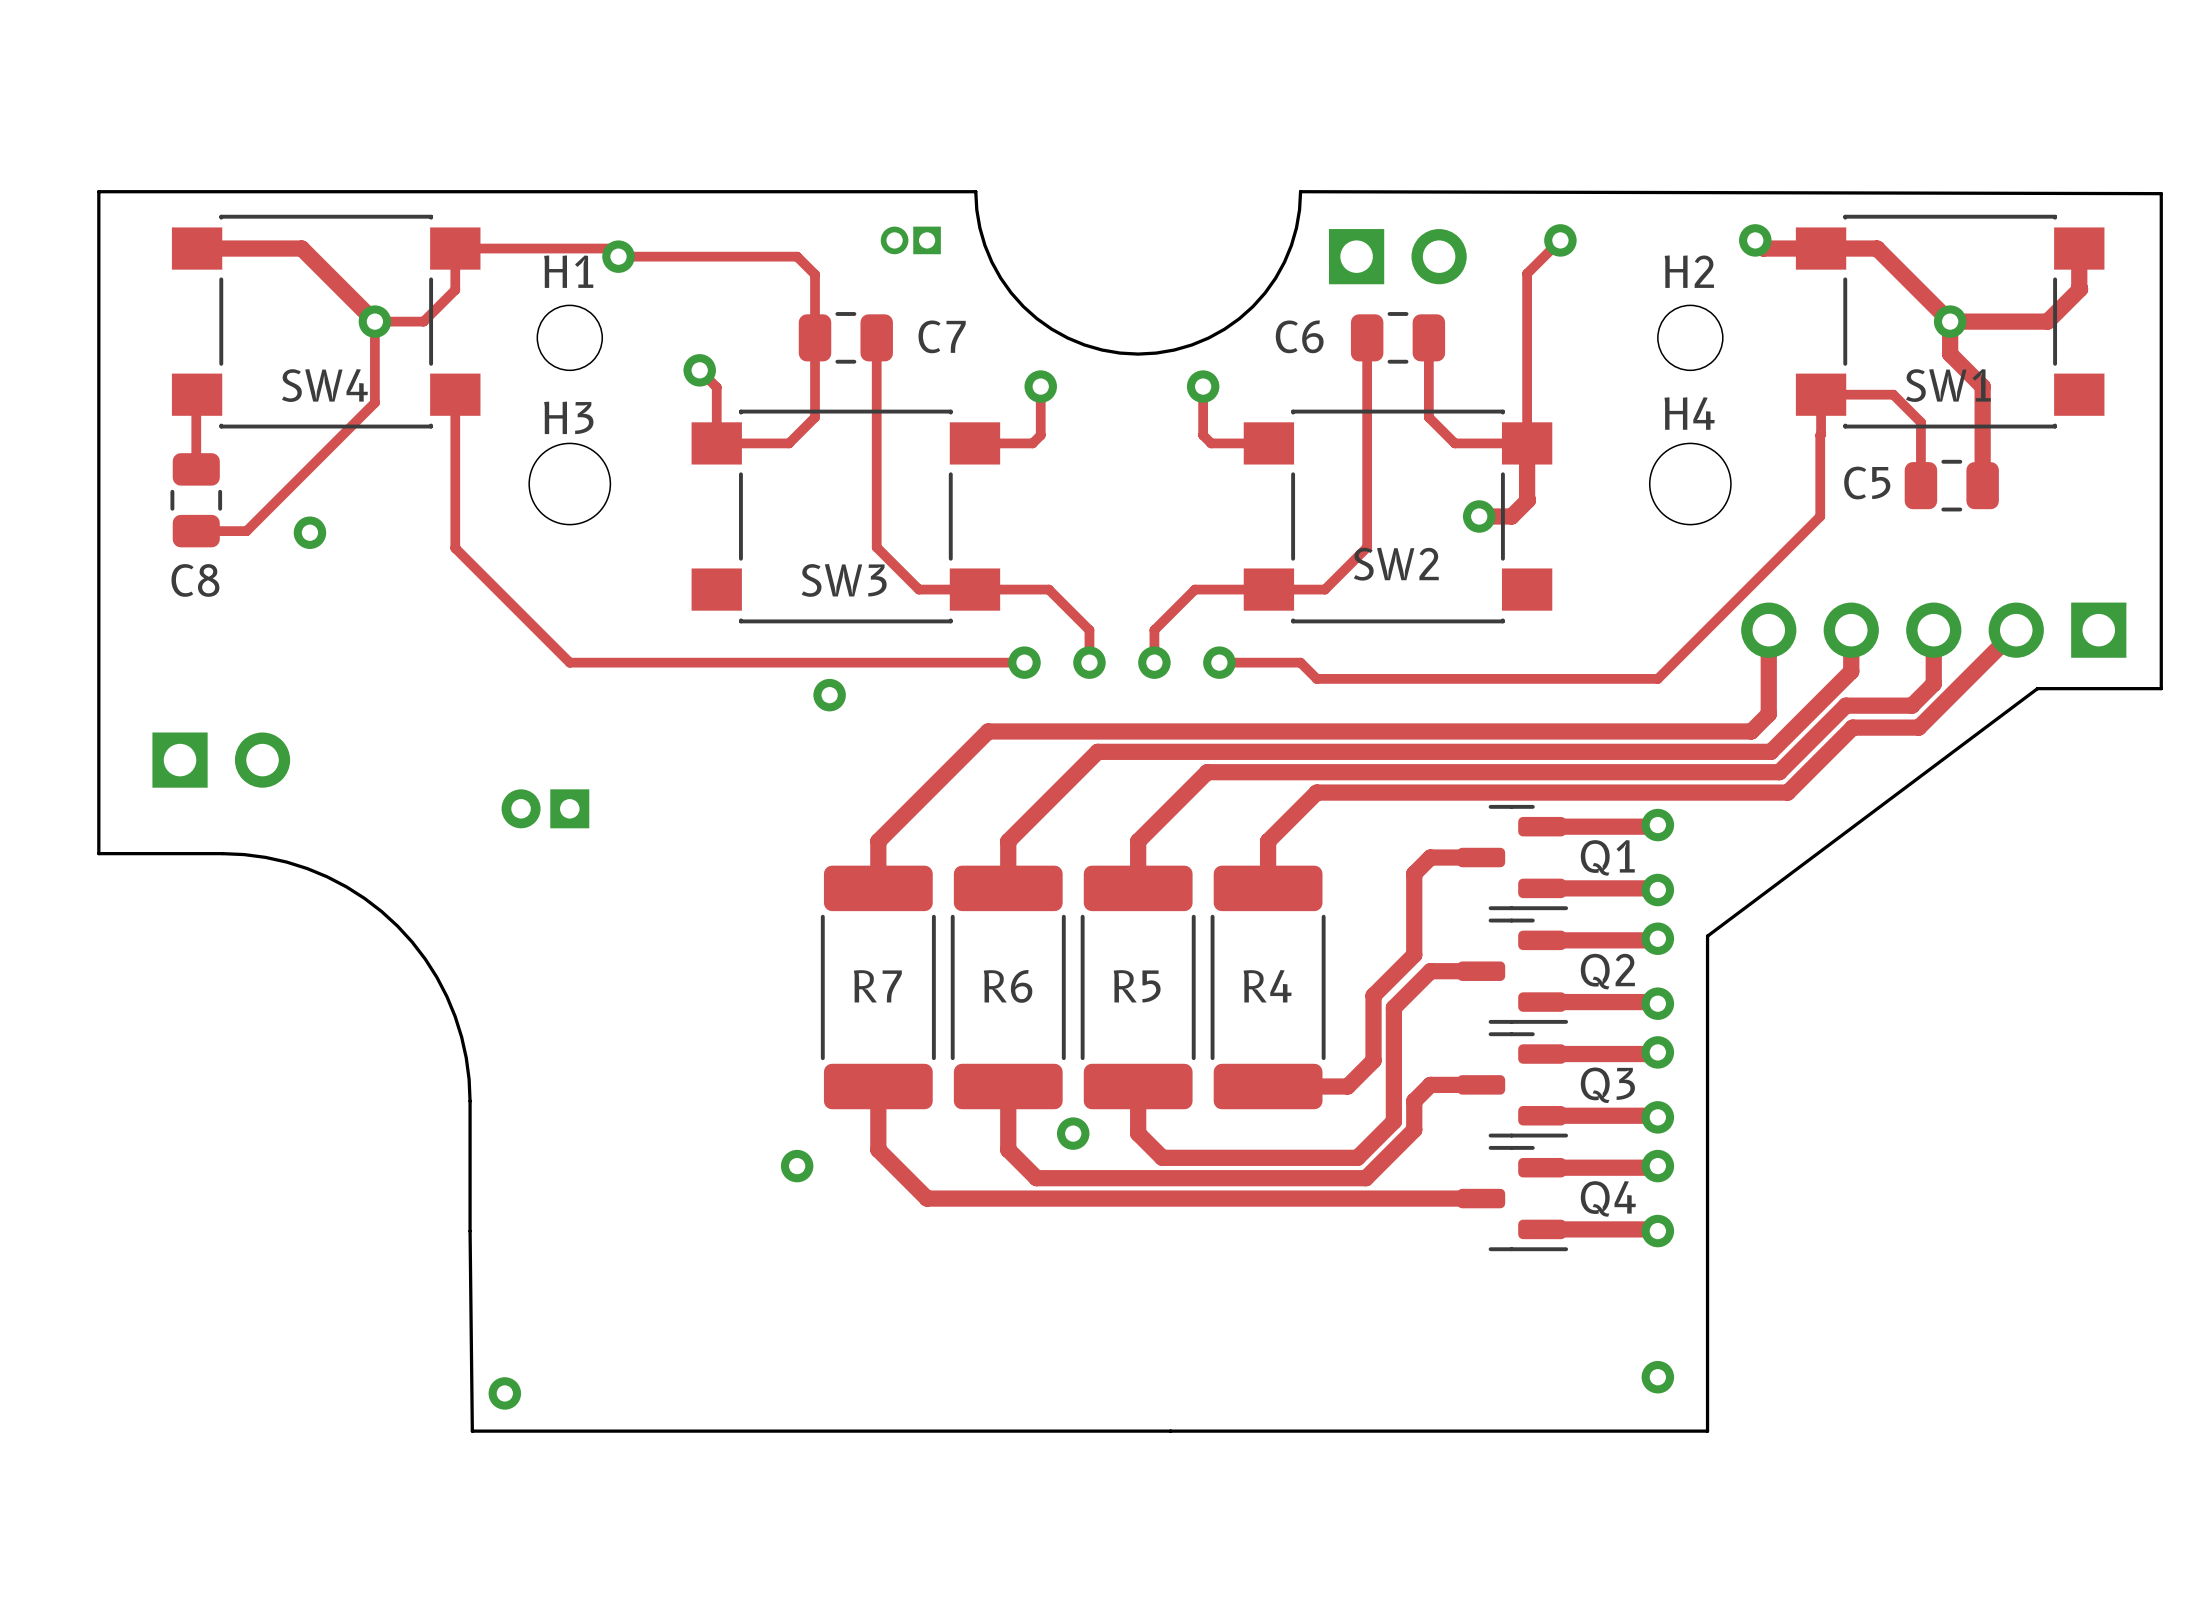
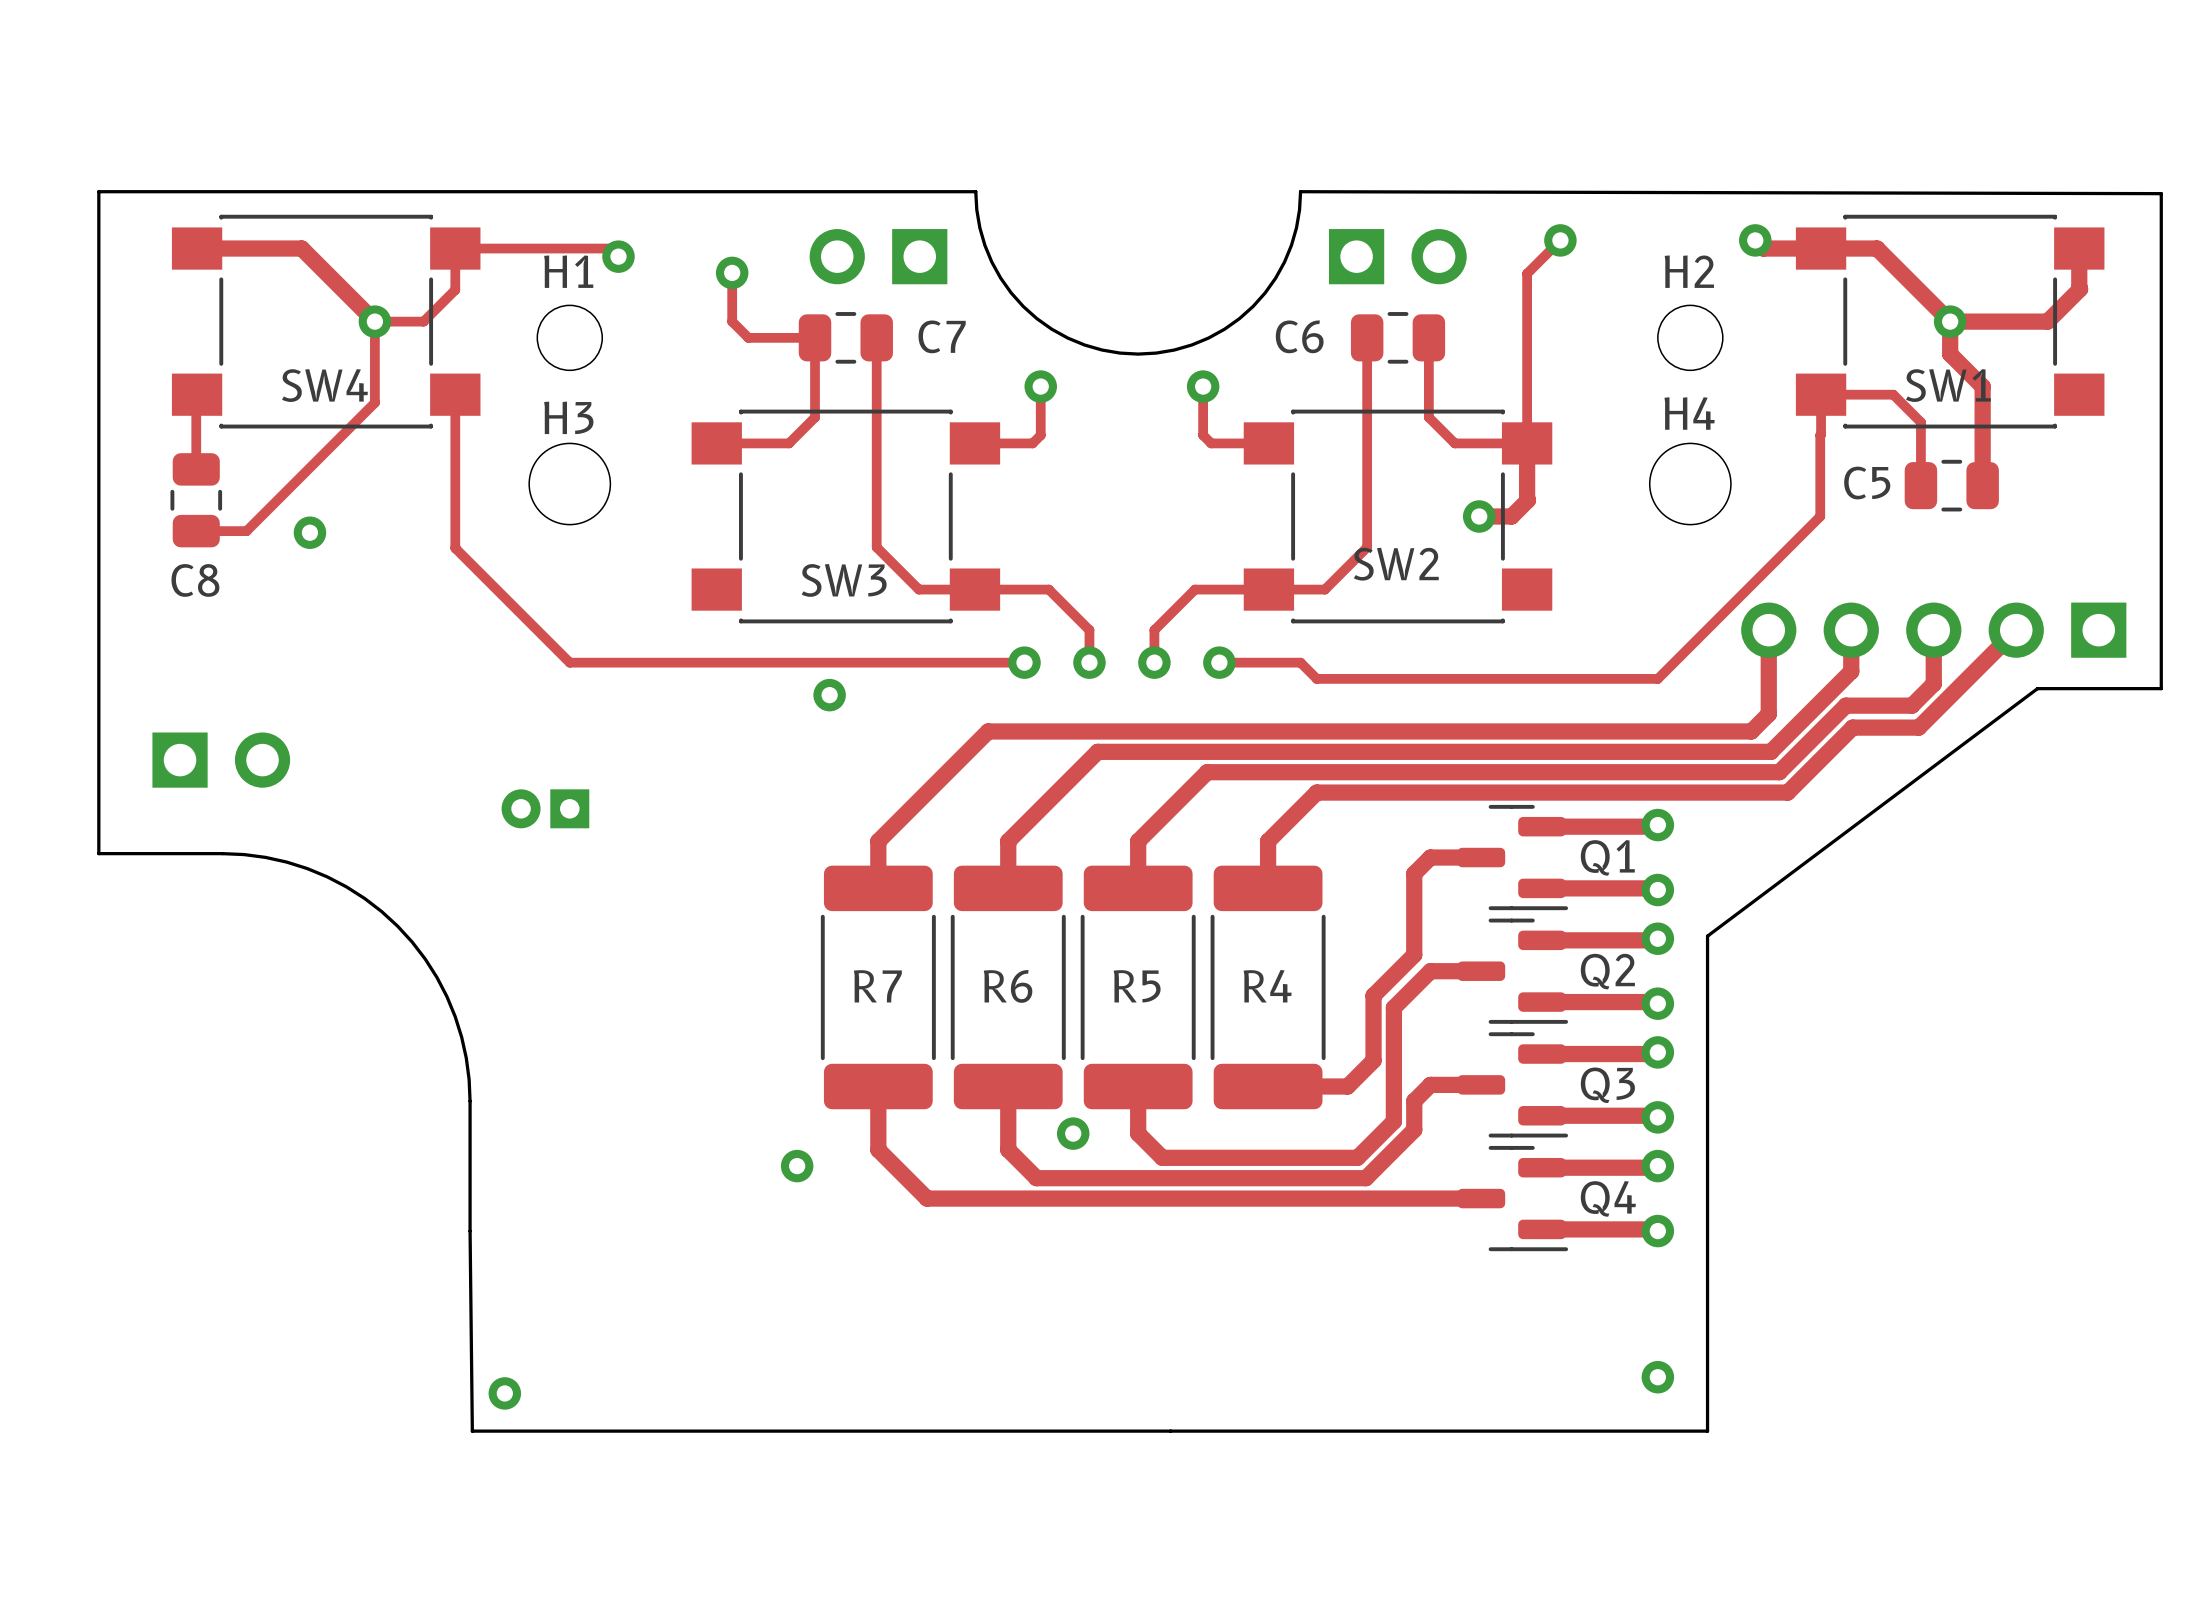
part: (910, 240) -> none
track: (618, 256) (797, 256) (815, 274) (815, 337) -> (732, 272) (732, 321) (748, 337) (815, 337)
part: none -> (878, 256)
track: (699, 370) (716, 387) (716, 443) -> none
via position: (699, 370) -> (732, 272)

